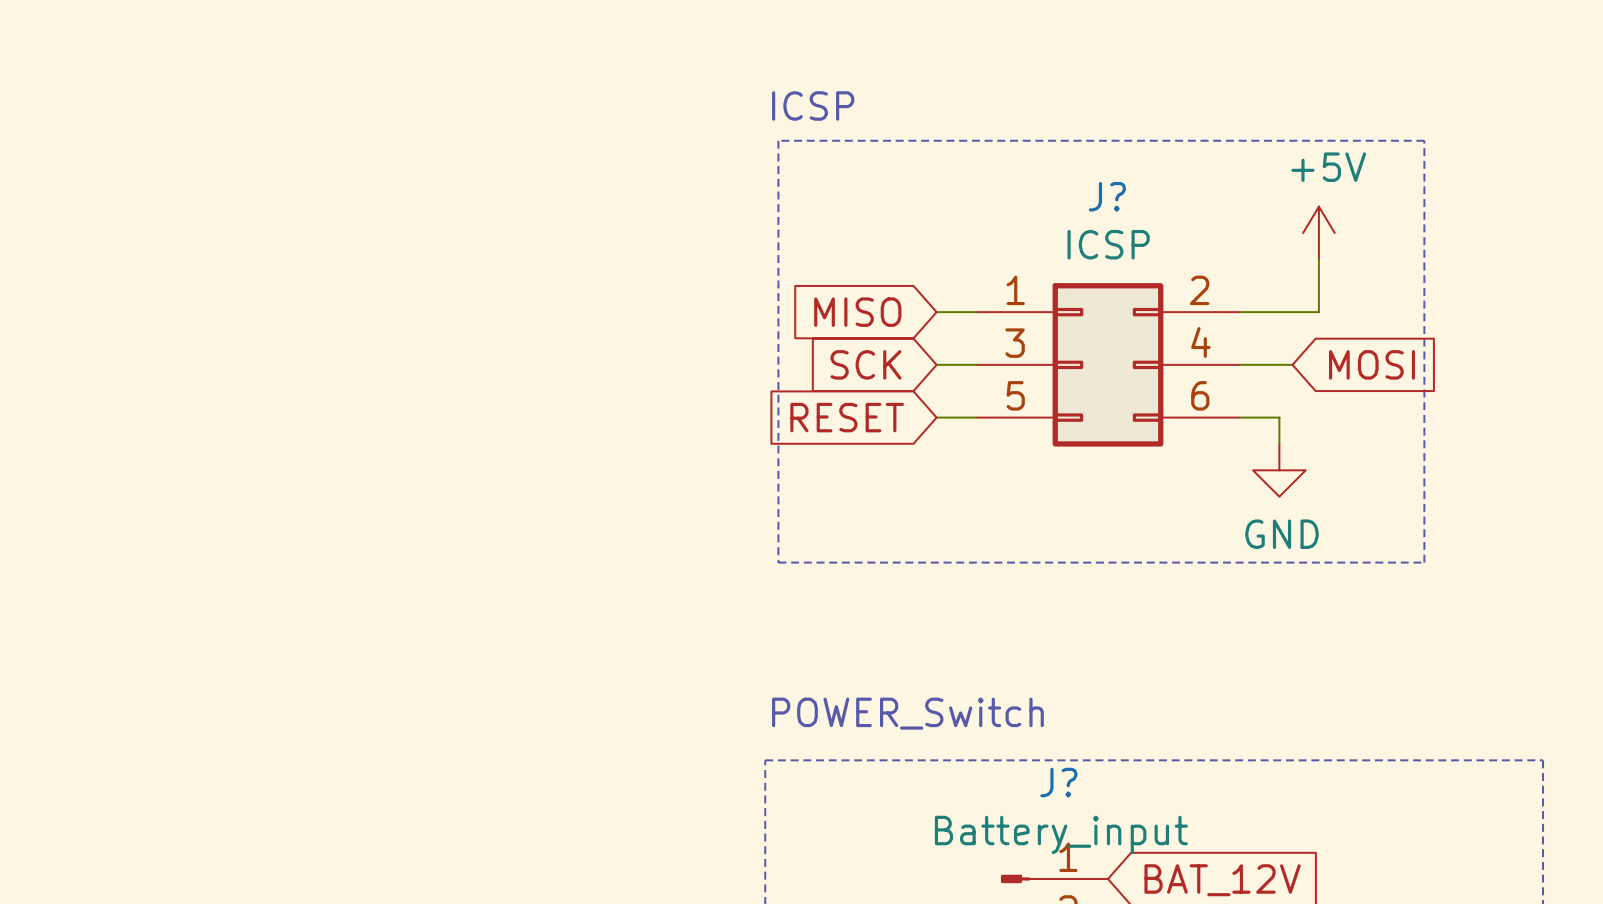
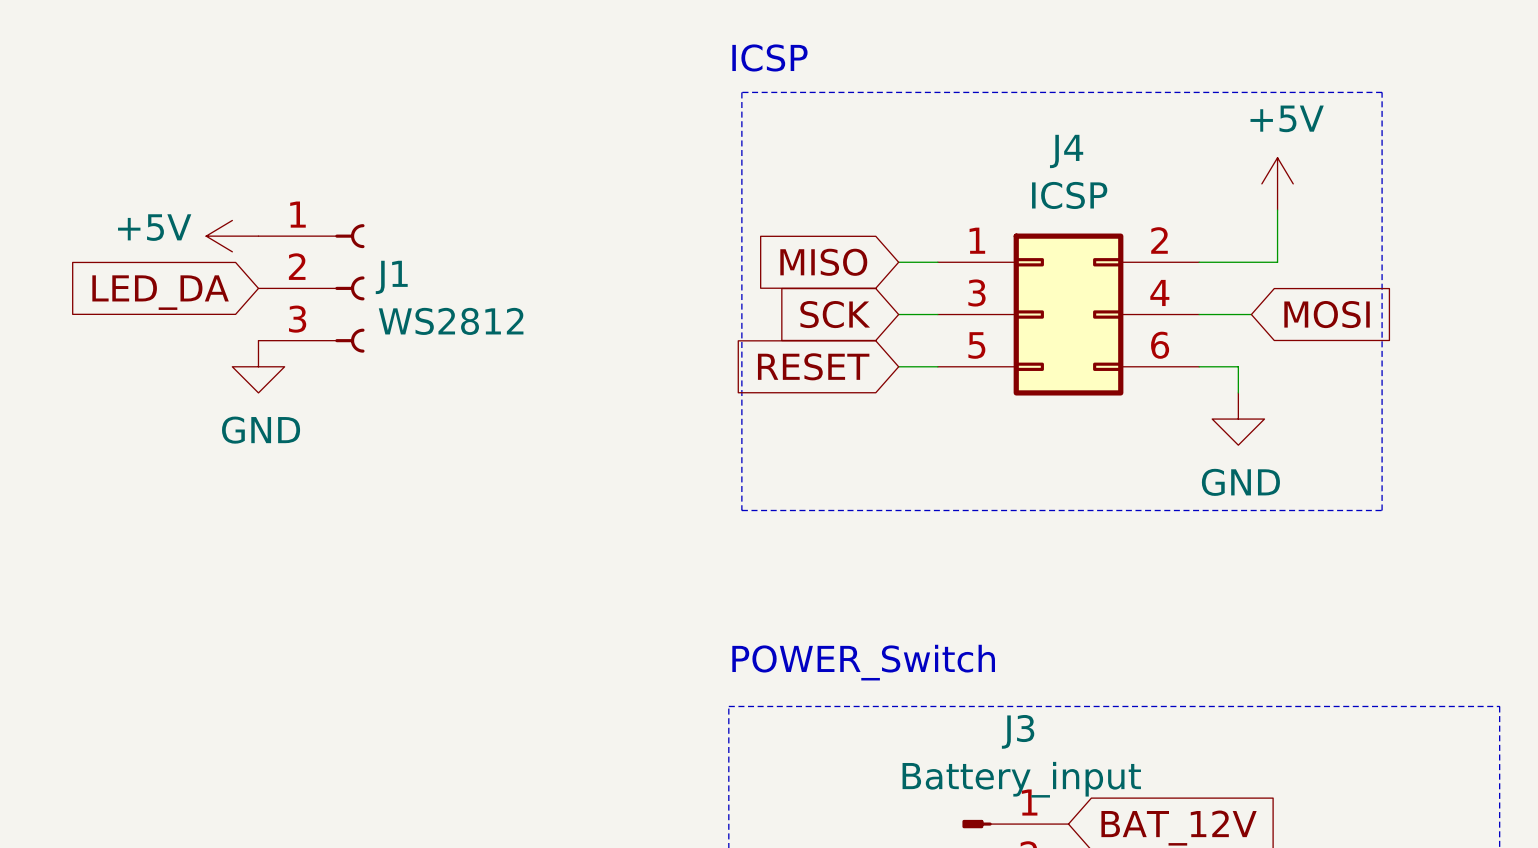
J? name: J? (1107, 196) -> J4 (1066, 151)
power symbol: none -> +5V (232, 236)
J1: none -> WS2812 (311, 288)
global label: none -> LED_DA (160, 292)
power symbol: none -> GND (258, 366)
J? name: J? (1058, 782) -> J3 (1018, 731)

